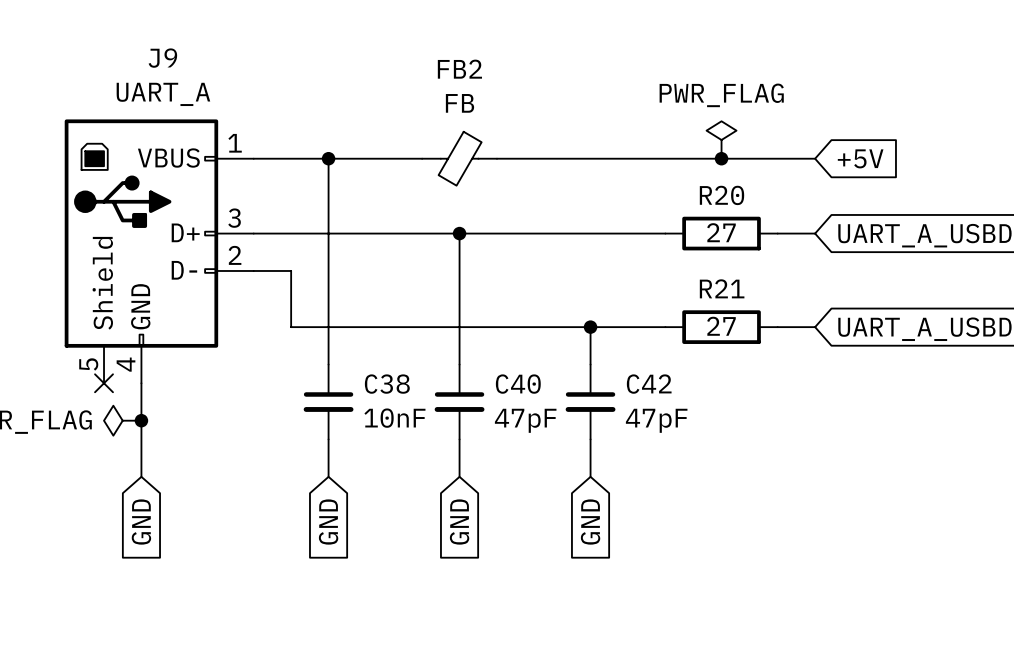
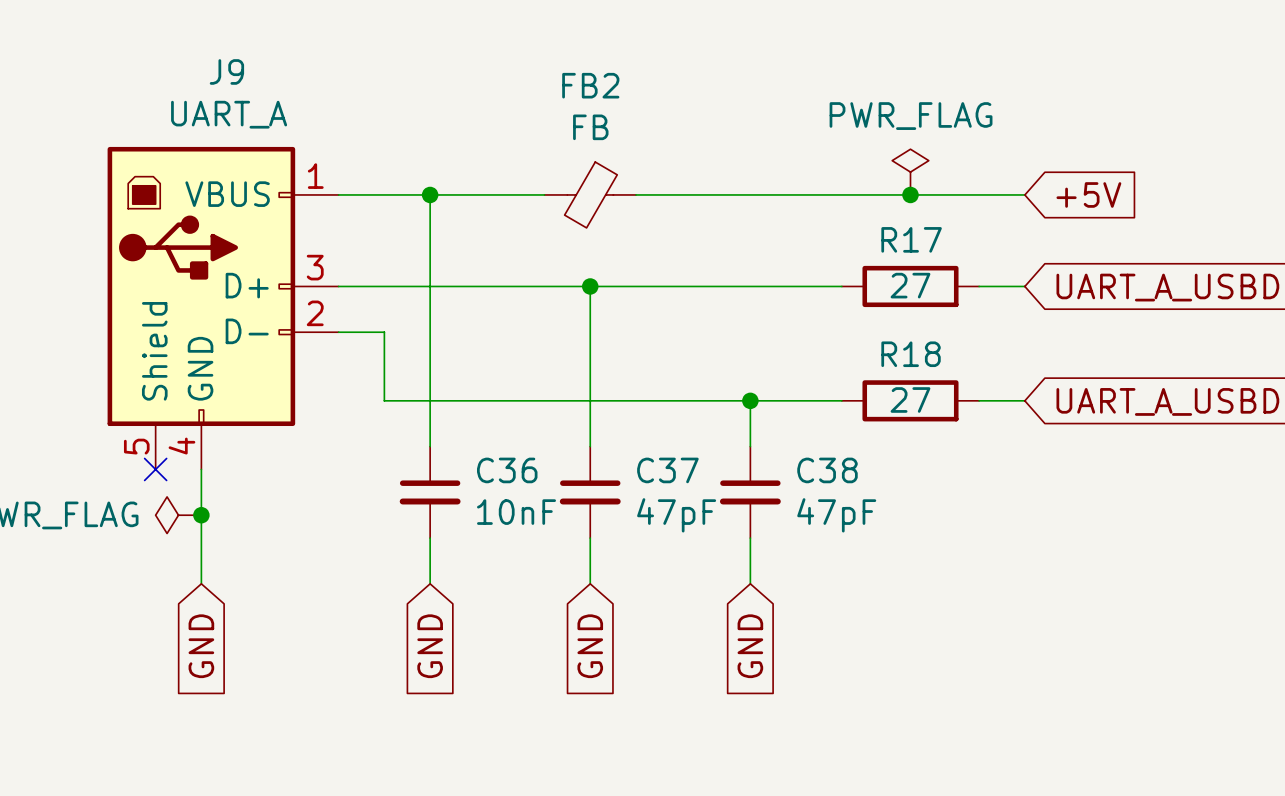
R20 name: R20 (721, 195) -> R17 (911, 239)
R21 name: R21 (722, 288) -> R18 (911, 354)
C38 name: C38 (387, 384) -> C36 (507, 470)
C40 name: C40 (518, 384) -> C37 (667, 470)
C42 name: C42 (649, 384) -> C38 (827, 470)

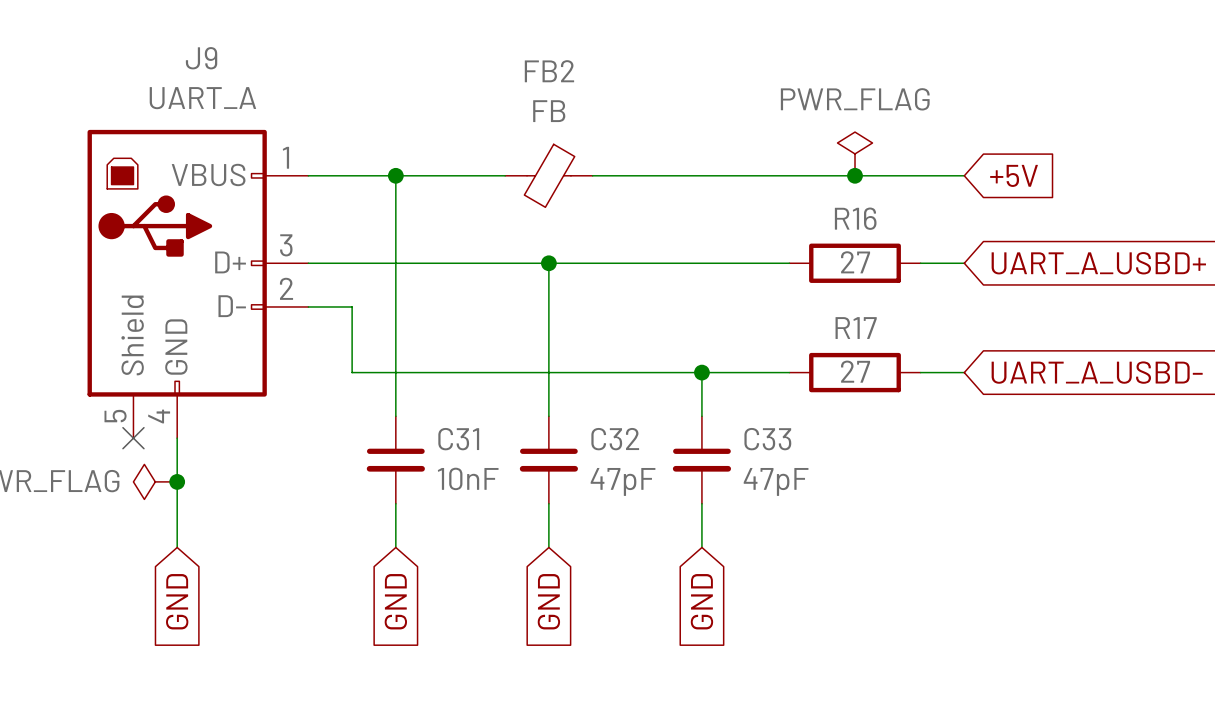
R17 name: R17 (911, 239) -> R16 (855, 218)
R18 name: R18 (911, 354) -> R17 (856, 328)
C36 name: C36 (507, 470) -> C31 (458, 439)
C37 name: C37 (667, 470) -> C32 (615, 439)
C38 name: C38 (827, 470) -> C33 (767, 439)

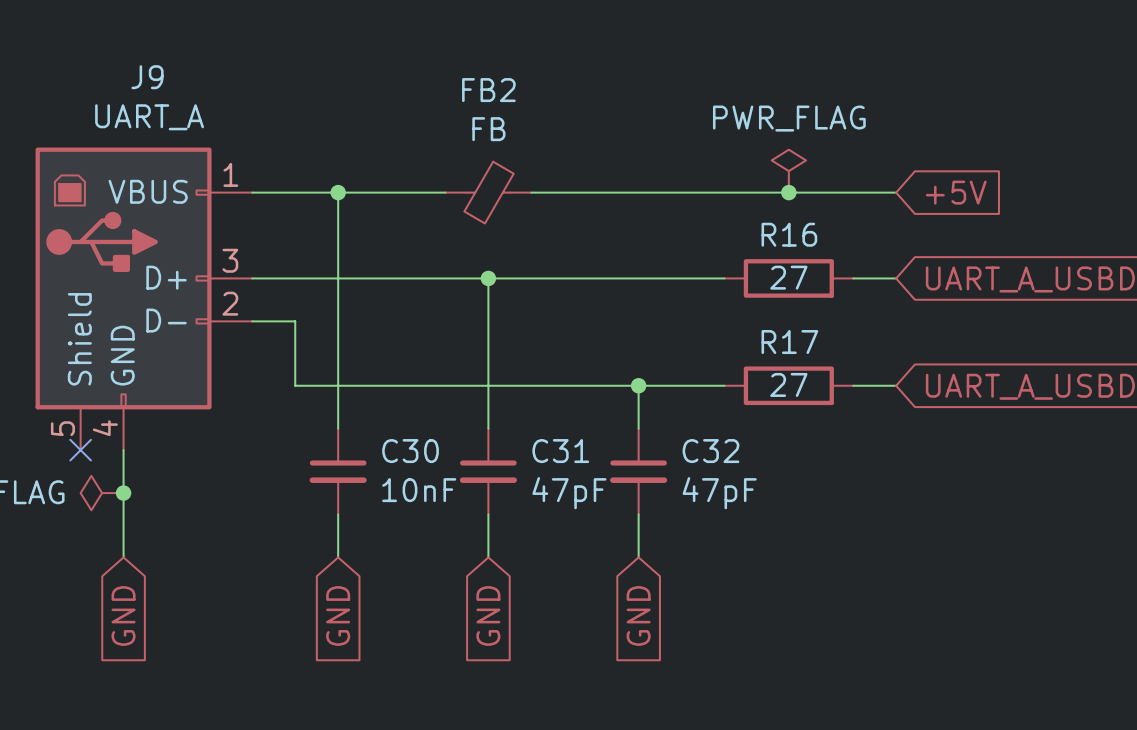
C31 name: C31 (458, 439) -> C30 (410, 451)
C32 name: C32 (615, 439) -> C31 (560, 451)
C33 name: C33 (767, 439) -> C32 (710, 451)

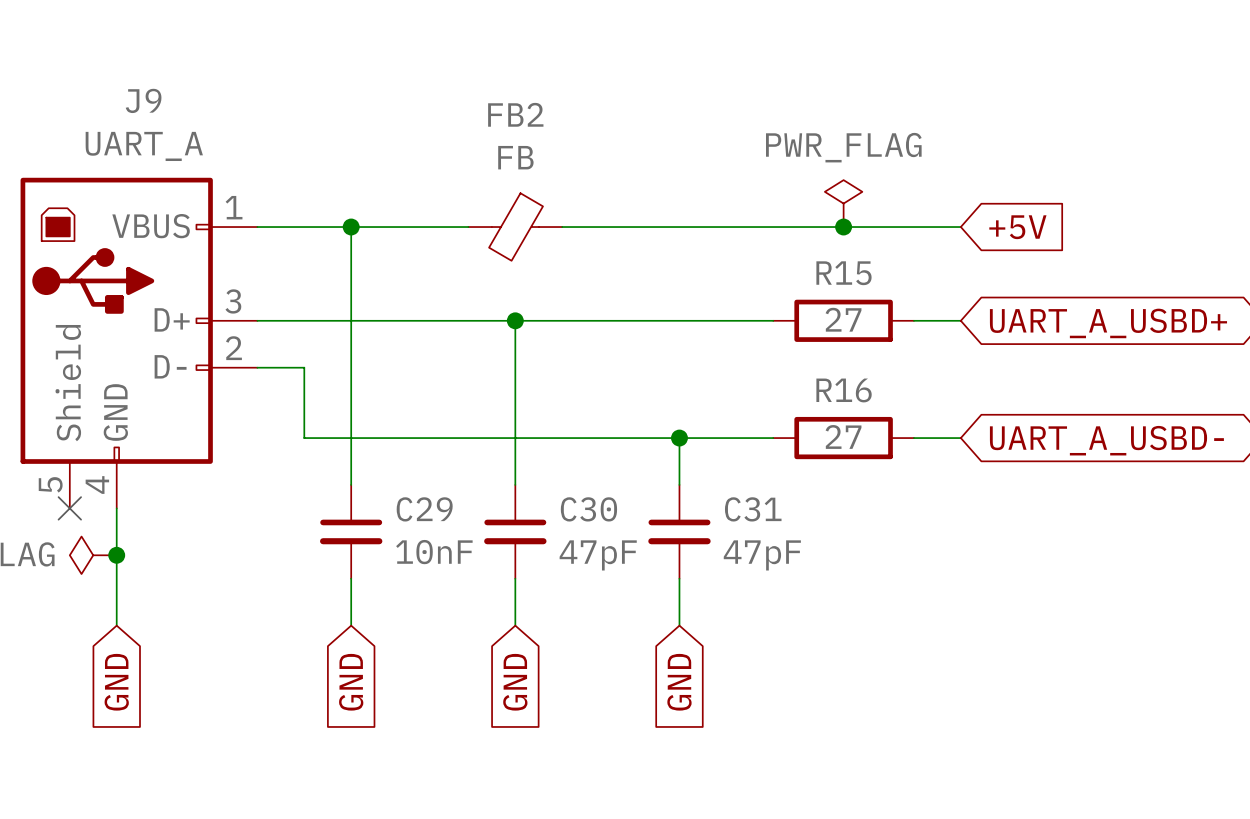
R16 name: R16 (789, 234) -> R15 (843, 273)
R17 name: R17 (789, 342) -> R16 (844, 390)
C30 name: C30 (410, 451) -> C29 (424, 509)
C31 name: C31 (560, 451) -> C30 (588, 509)
C32 name: C32 (710, 451) -> C31 (753, 509)

